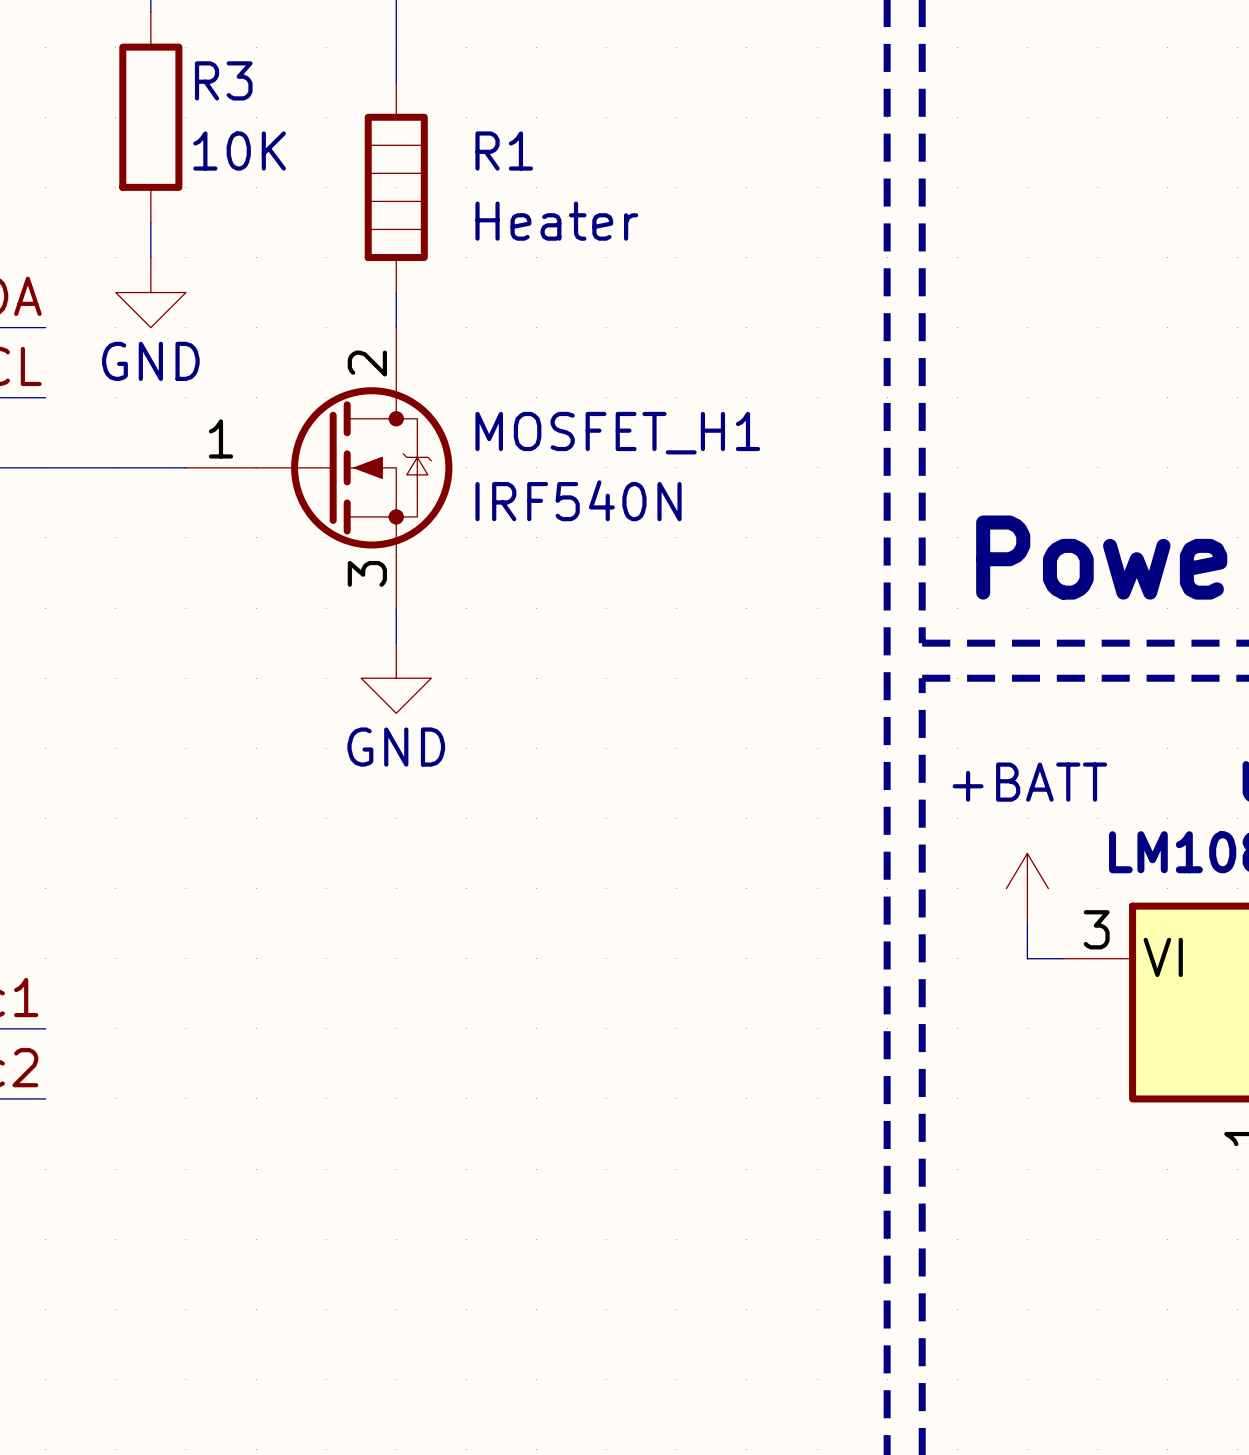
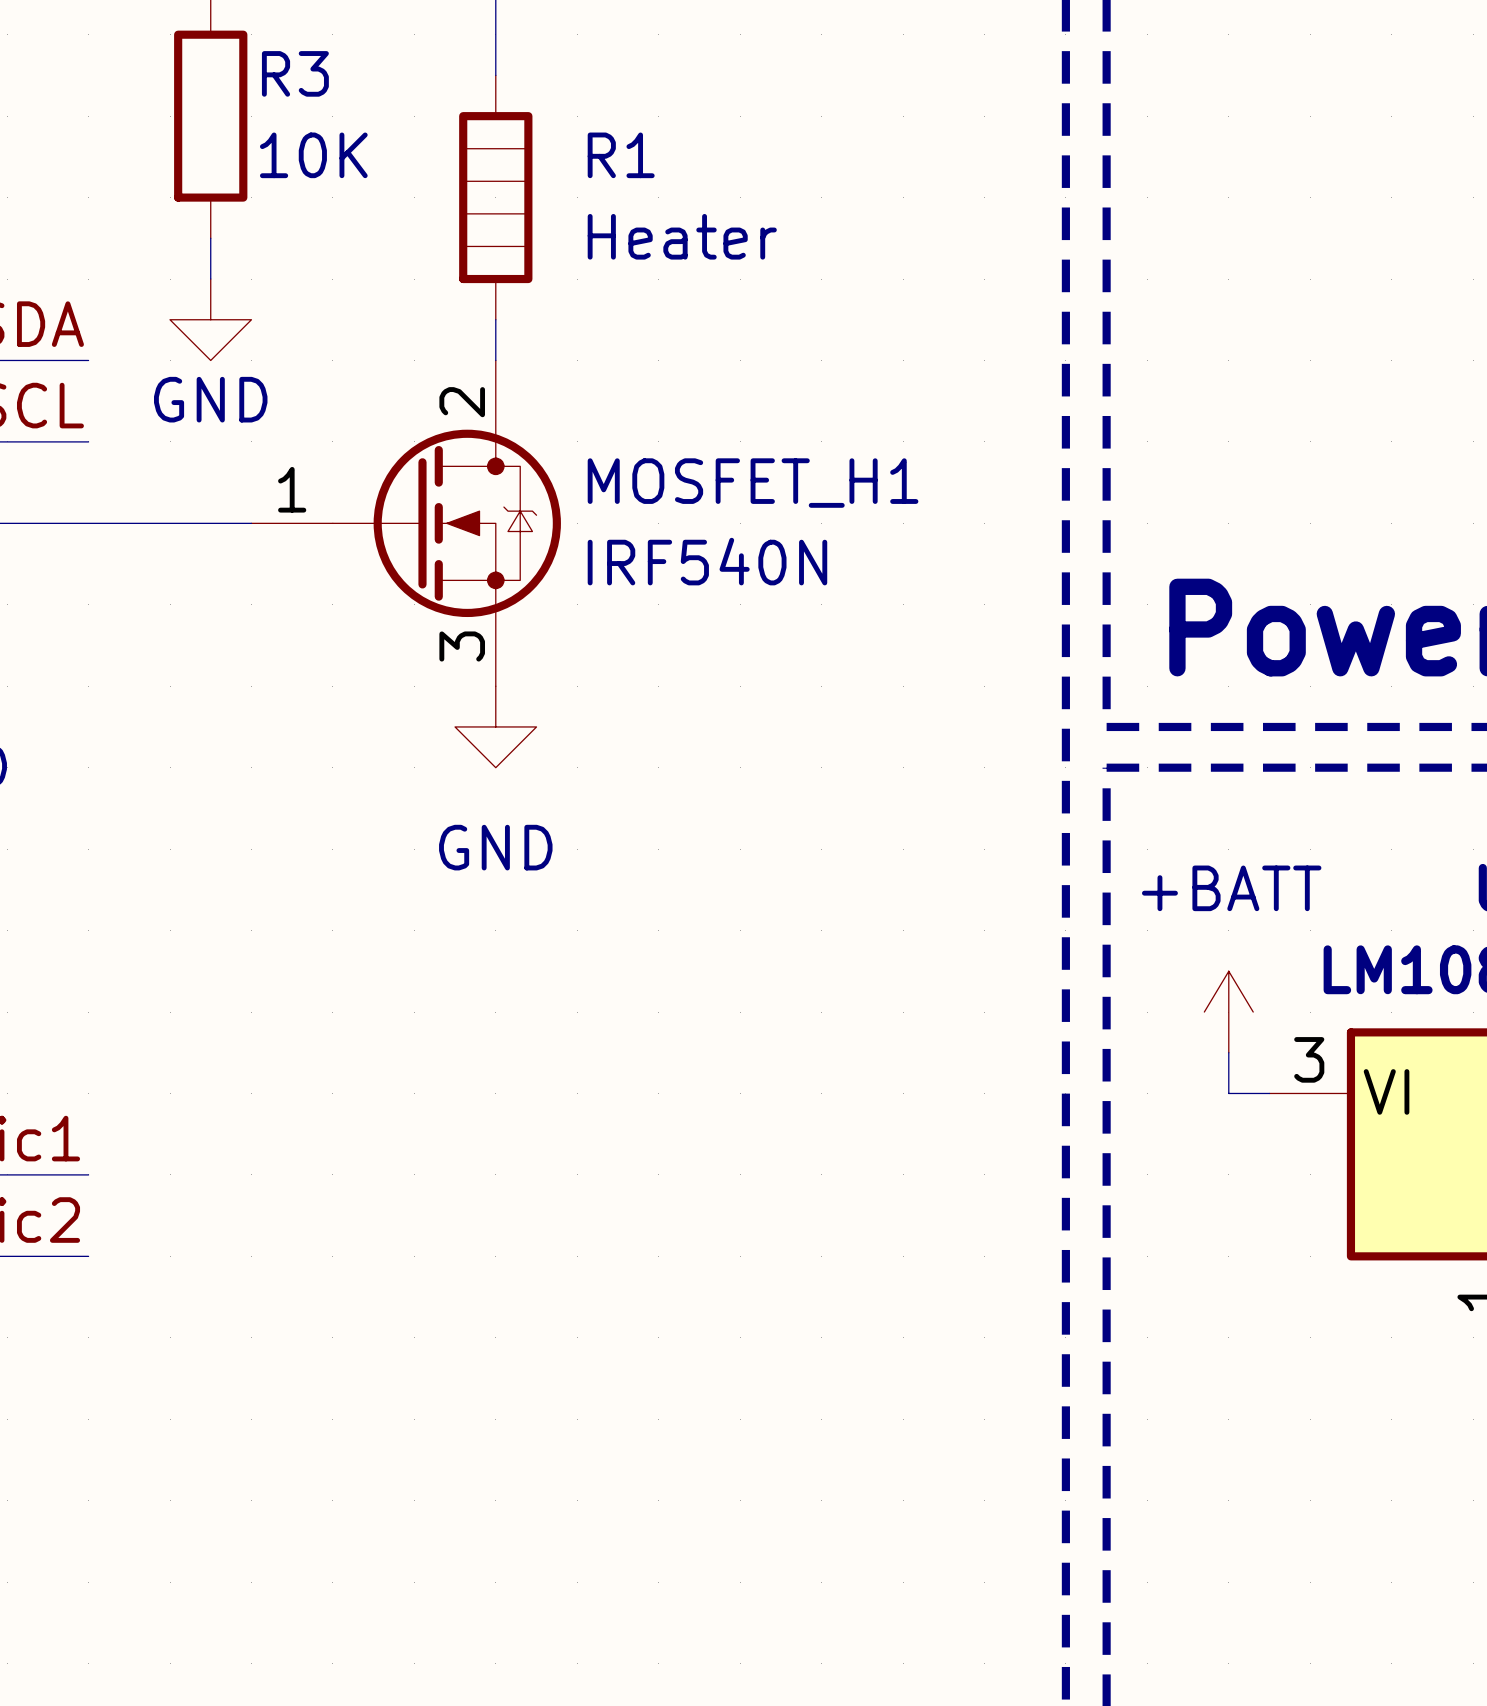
power symbol position: GND (396, 678) -> GND (495, 726)

